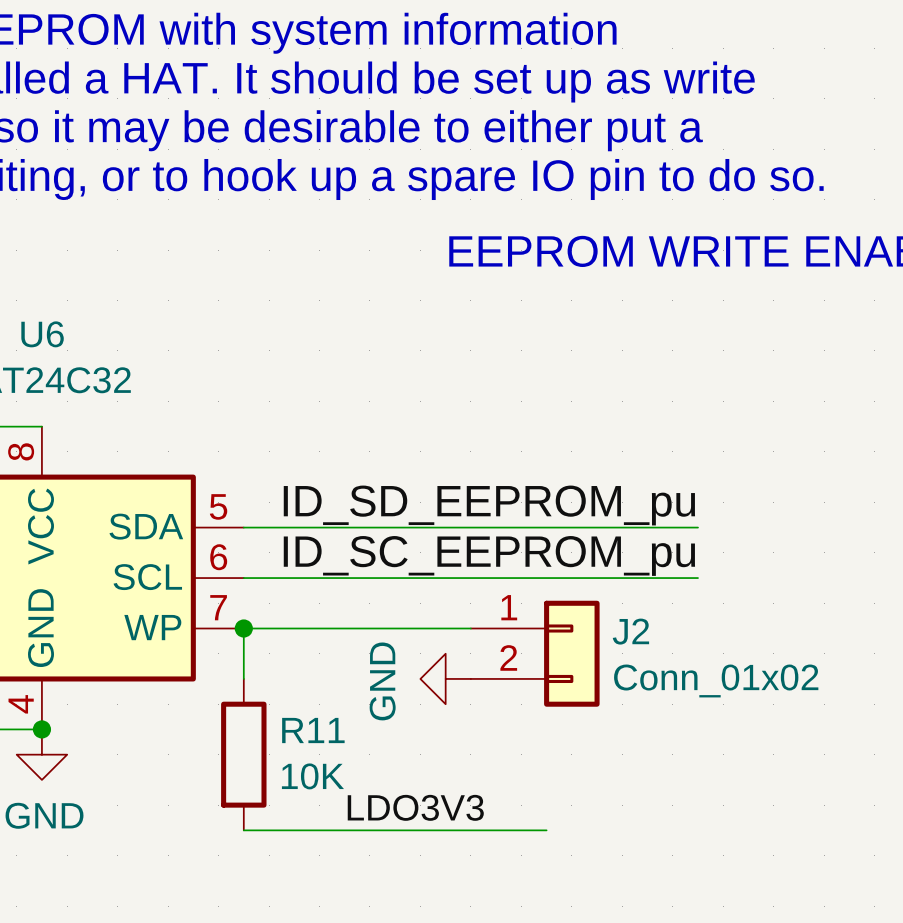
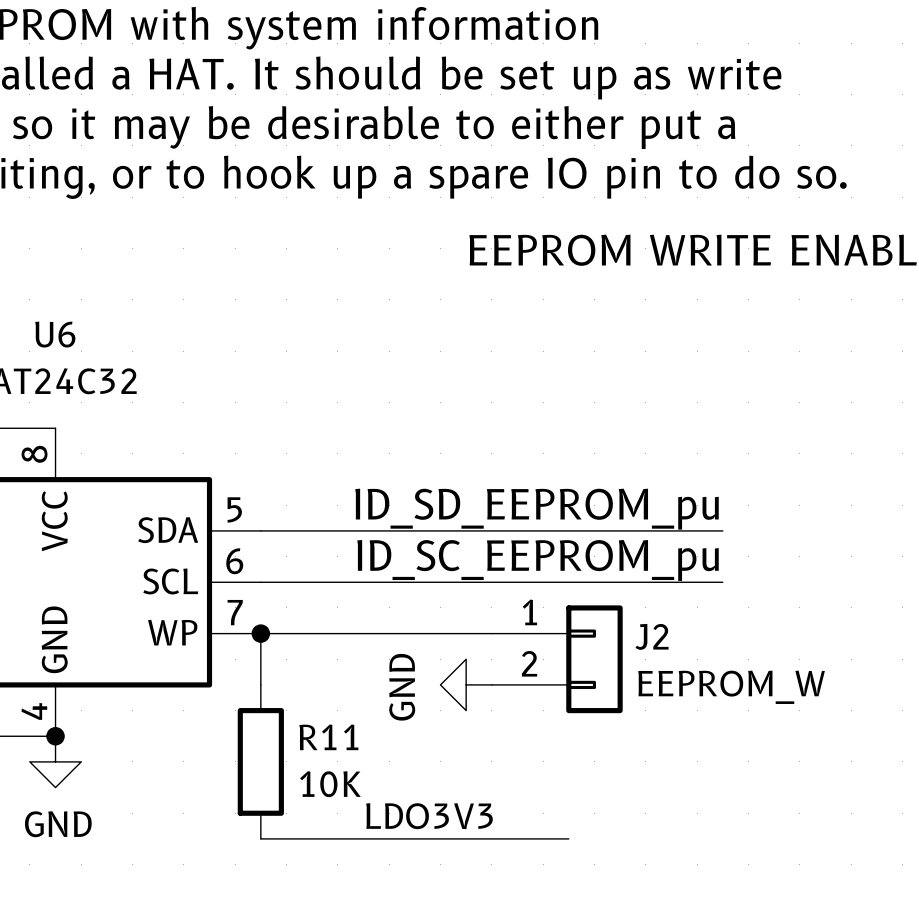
J2 value: Conn_01x02 (716, 680) -> EEPROM_W (731, 687)

